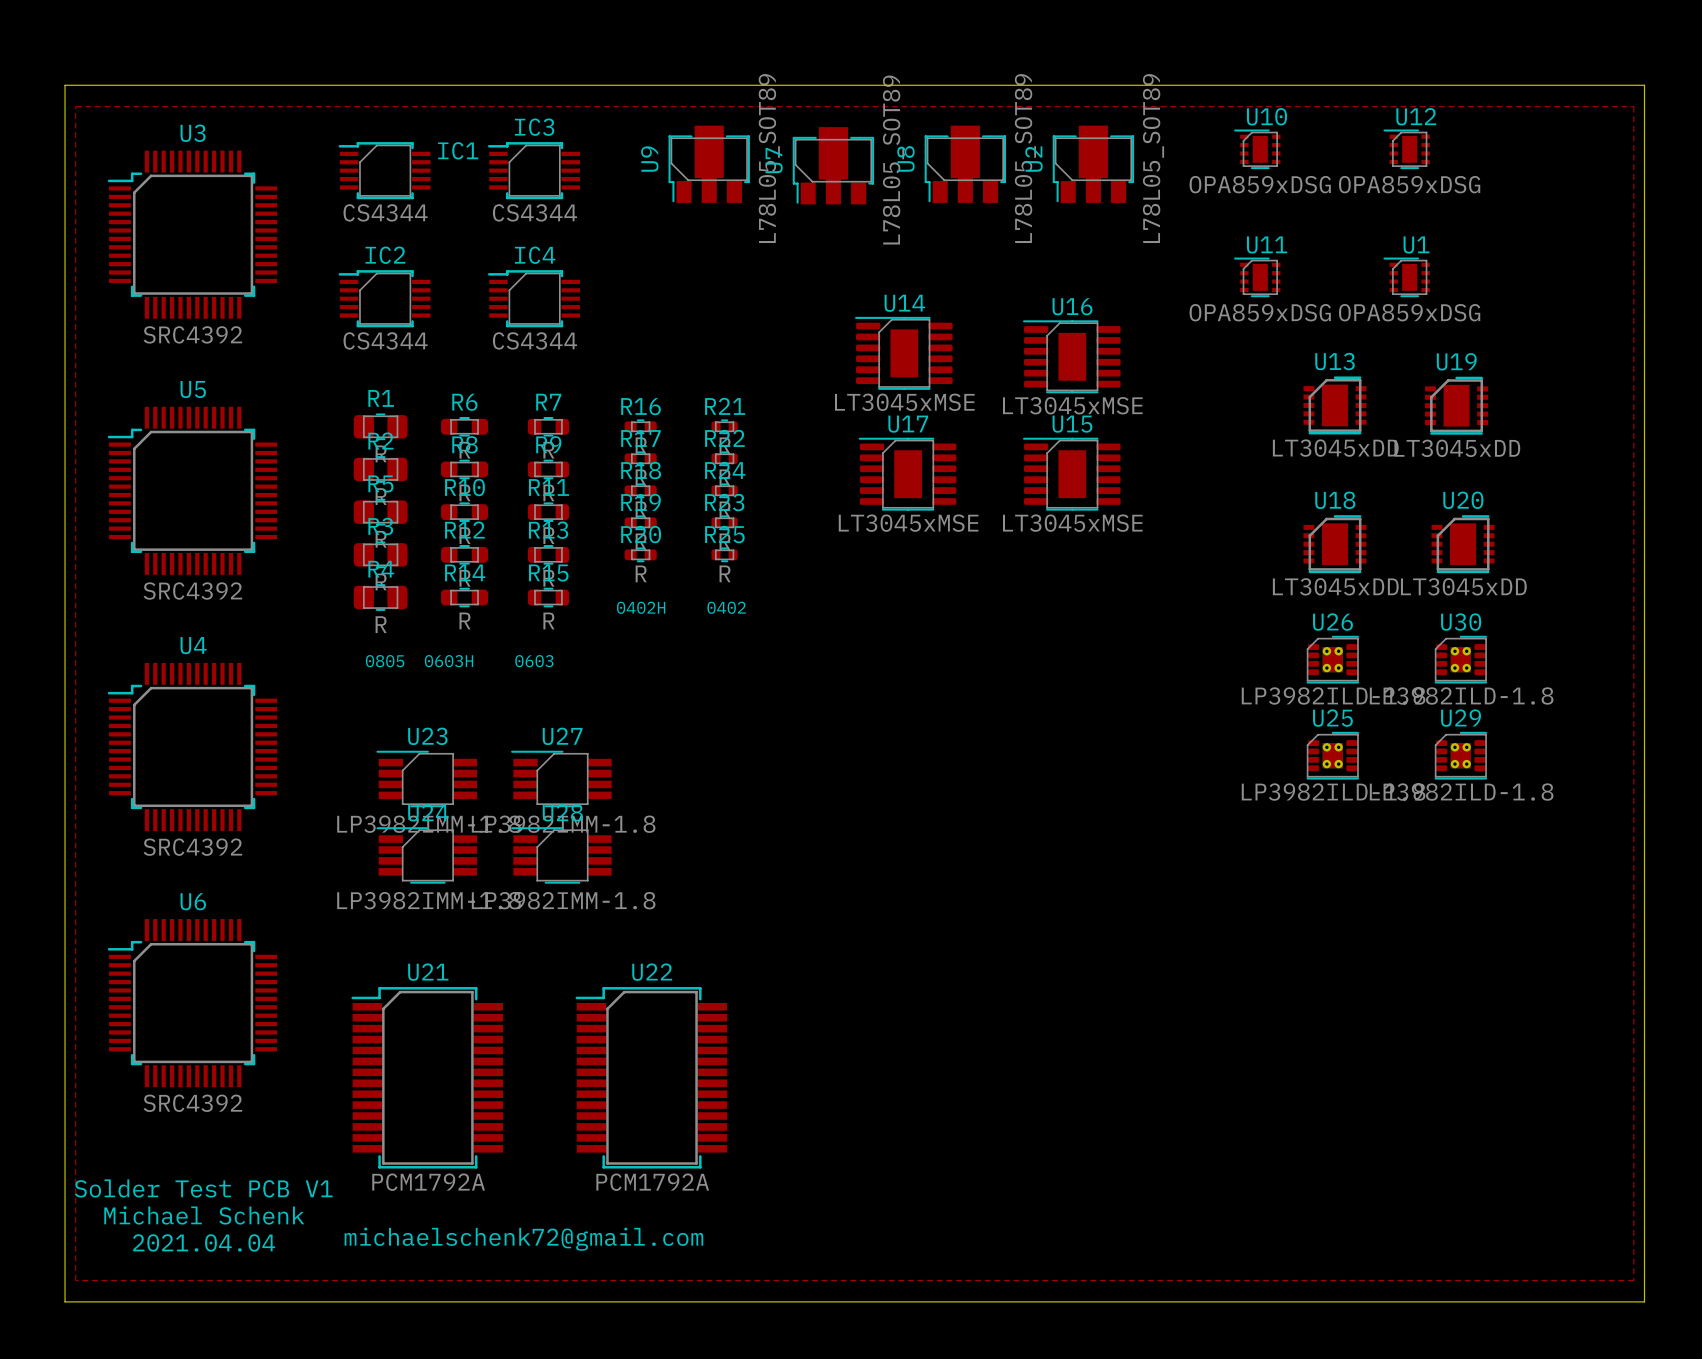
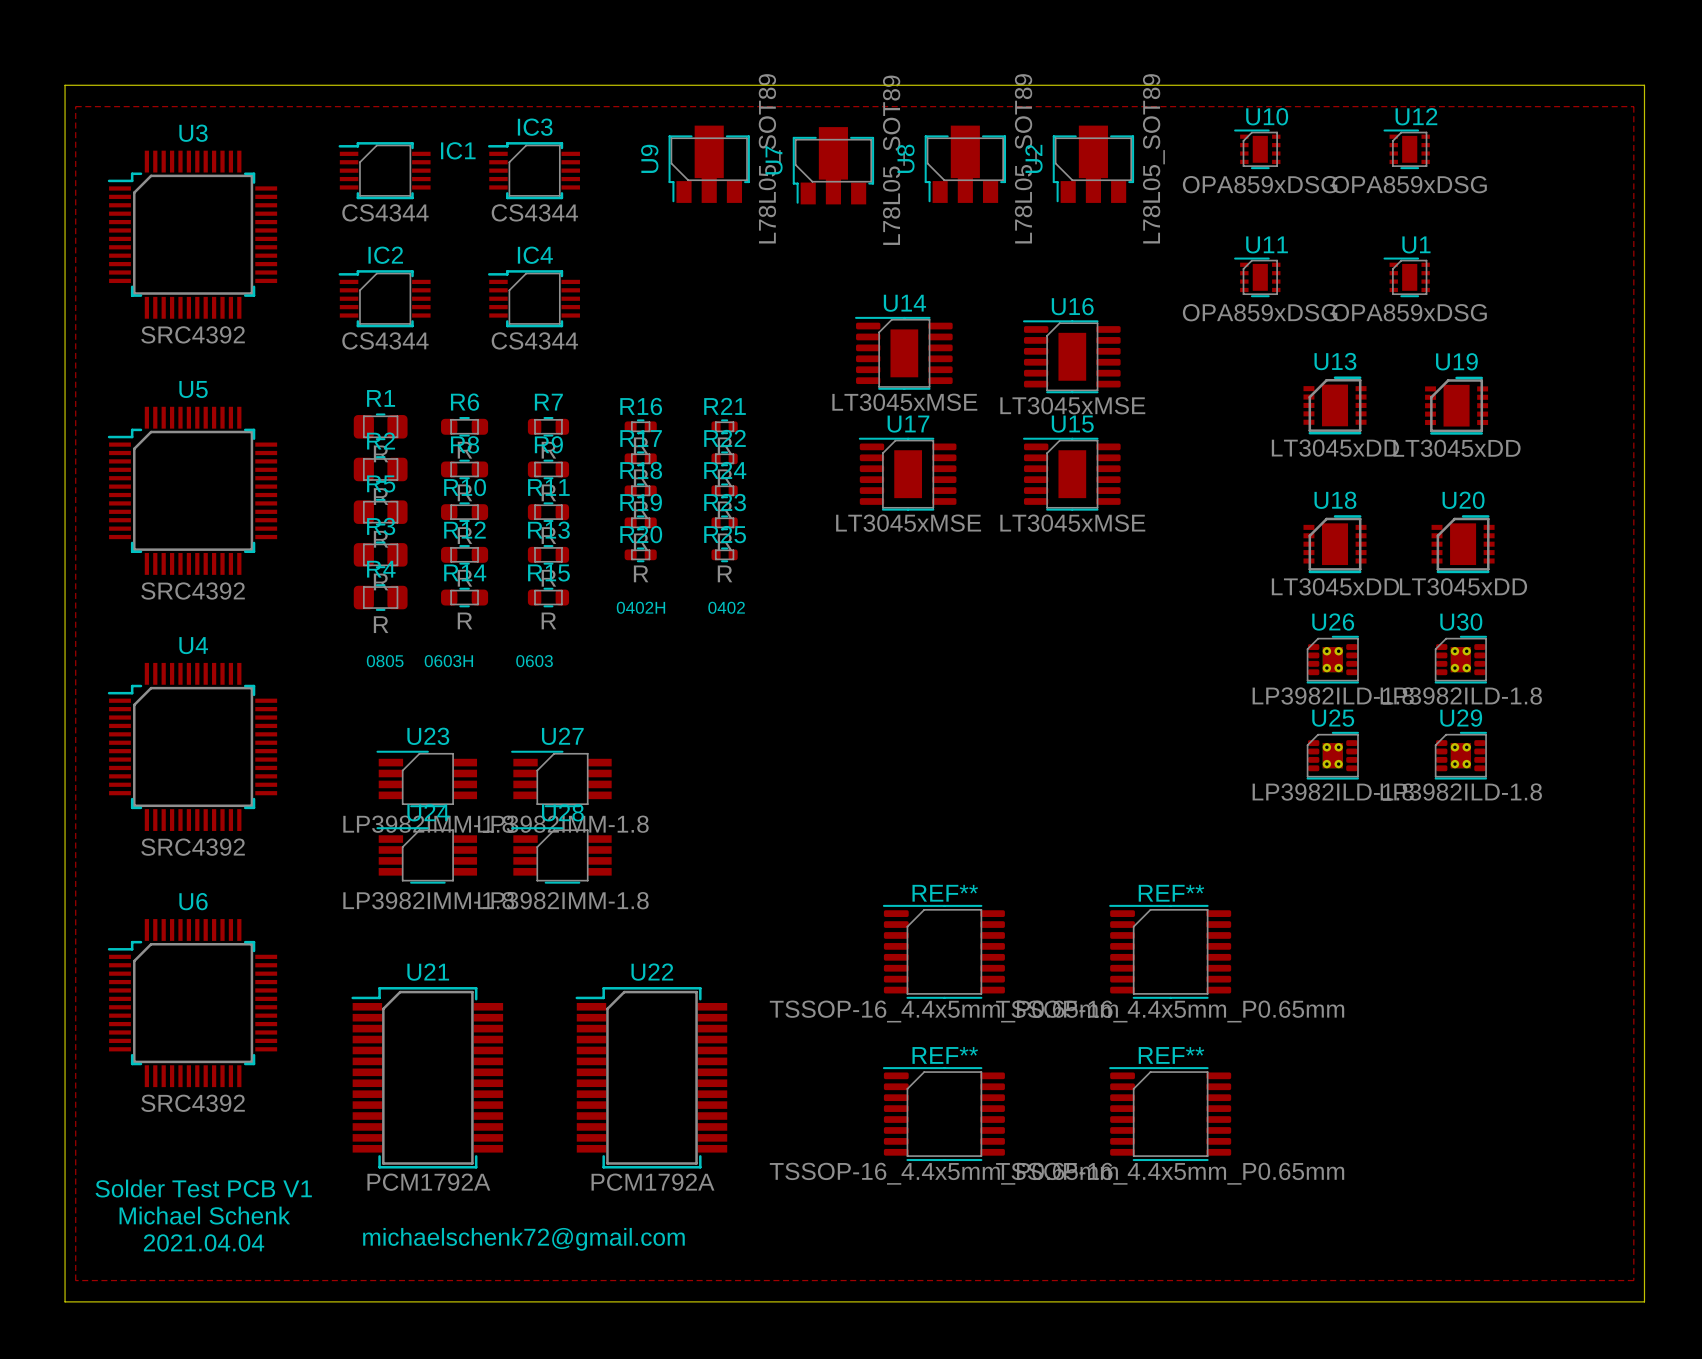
REF**: none -> TSSOP-16_4.4x5mm_P0.65mm (943, 951)
REF**: none -> TSSOP-16_4.4x5mm_P0.65mm (1170, 951)
REF**: none -> TSSOP-16_4.4x5mm_P0.65mm (943, 1114)
REF**: none -> TSSOP-16_4.4x5mm_P0.65mm (1170, 1114)

